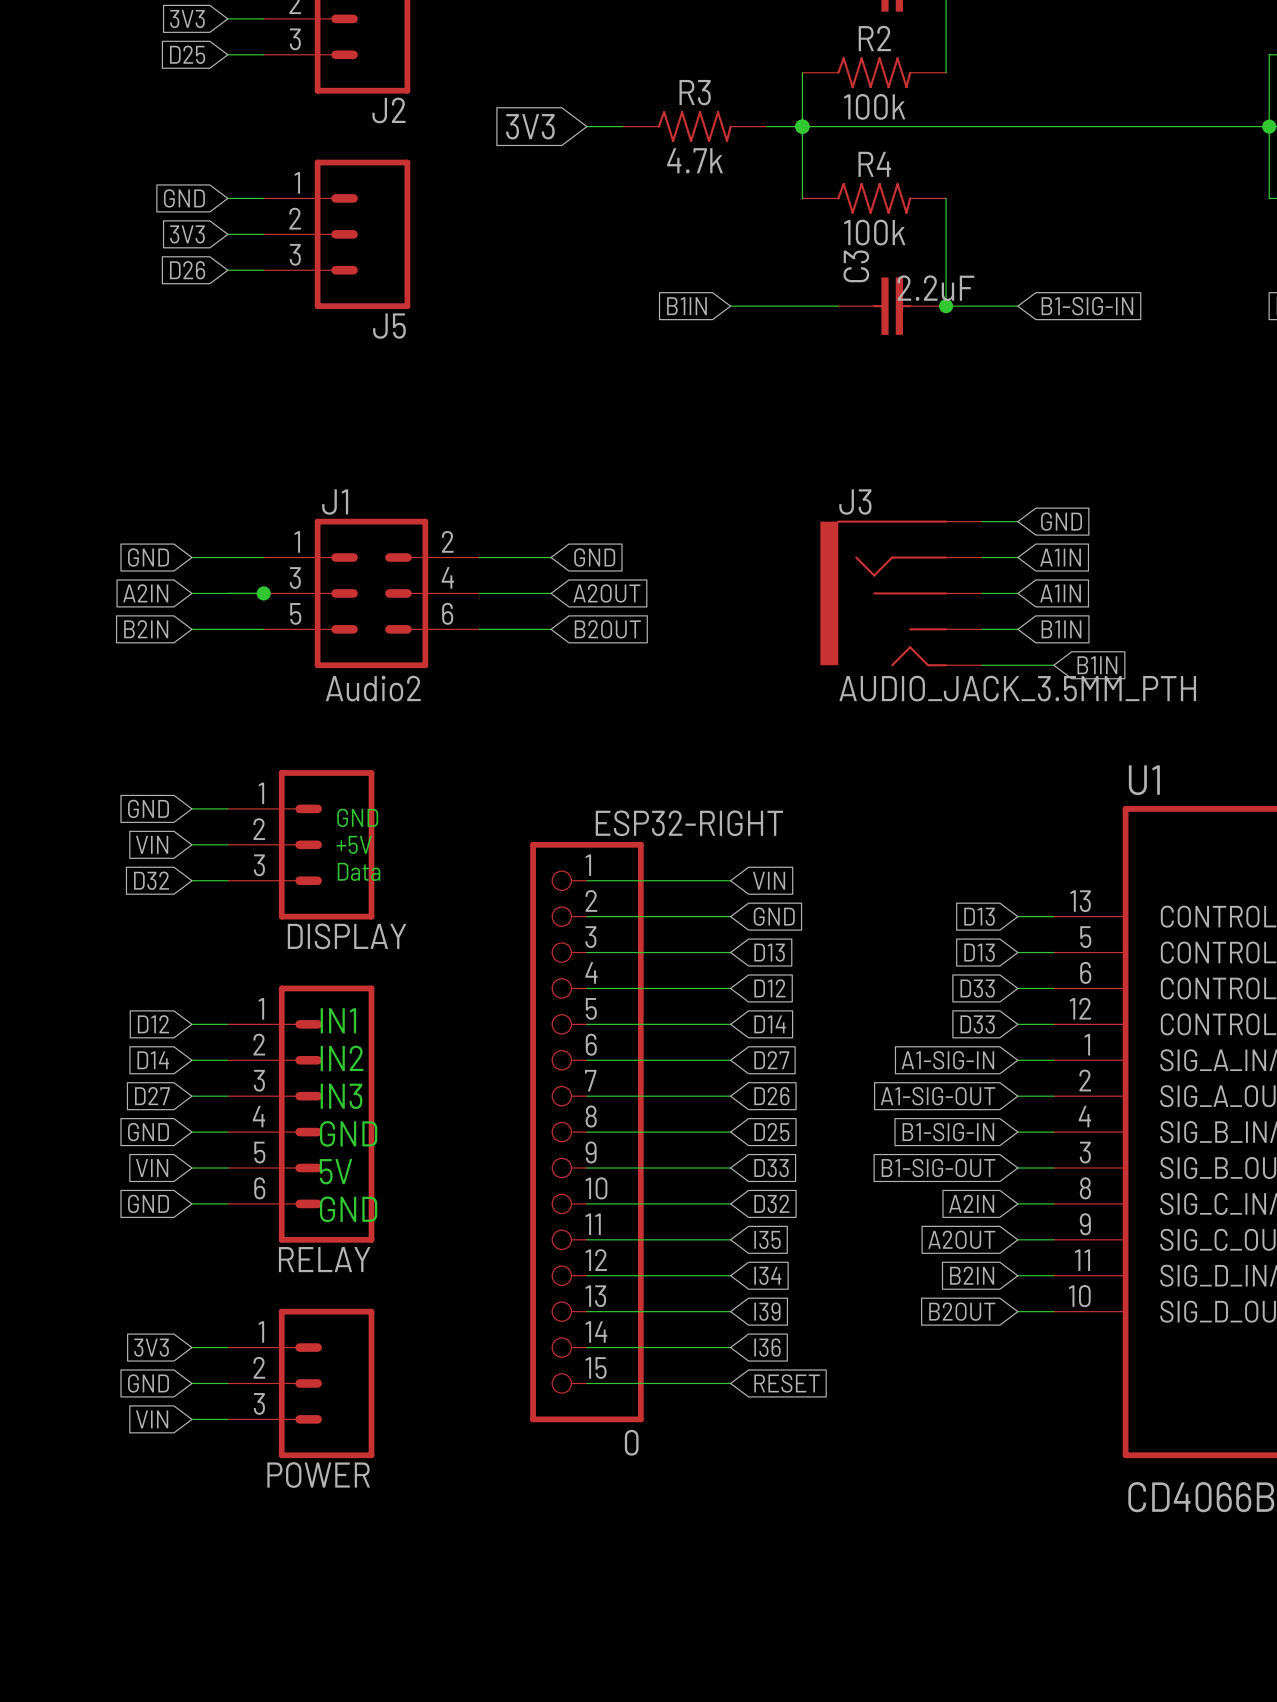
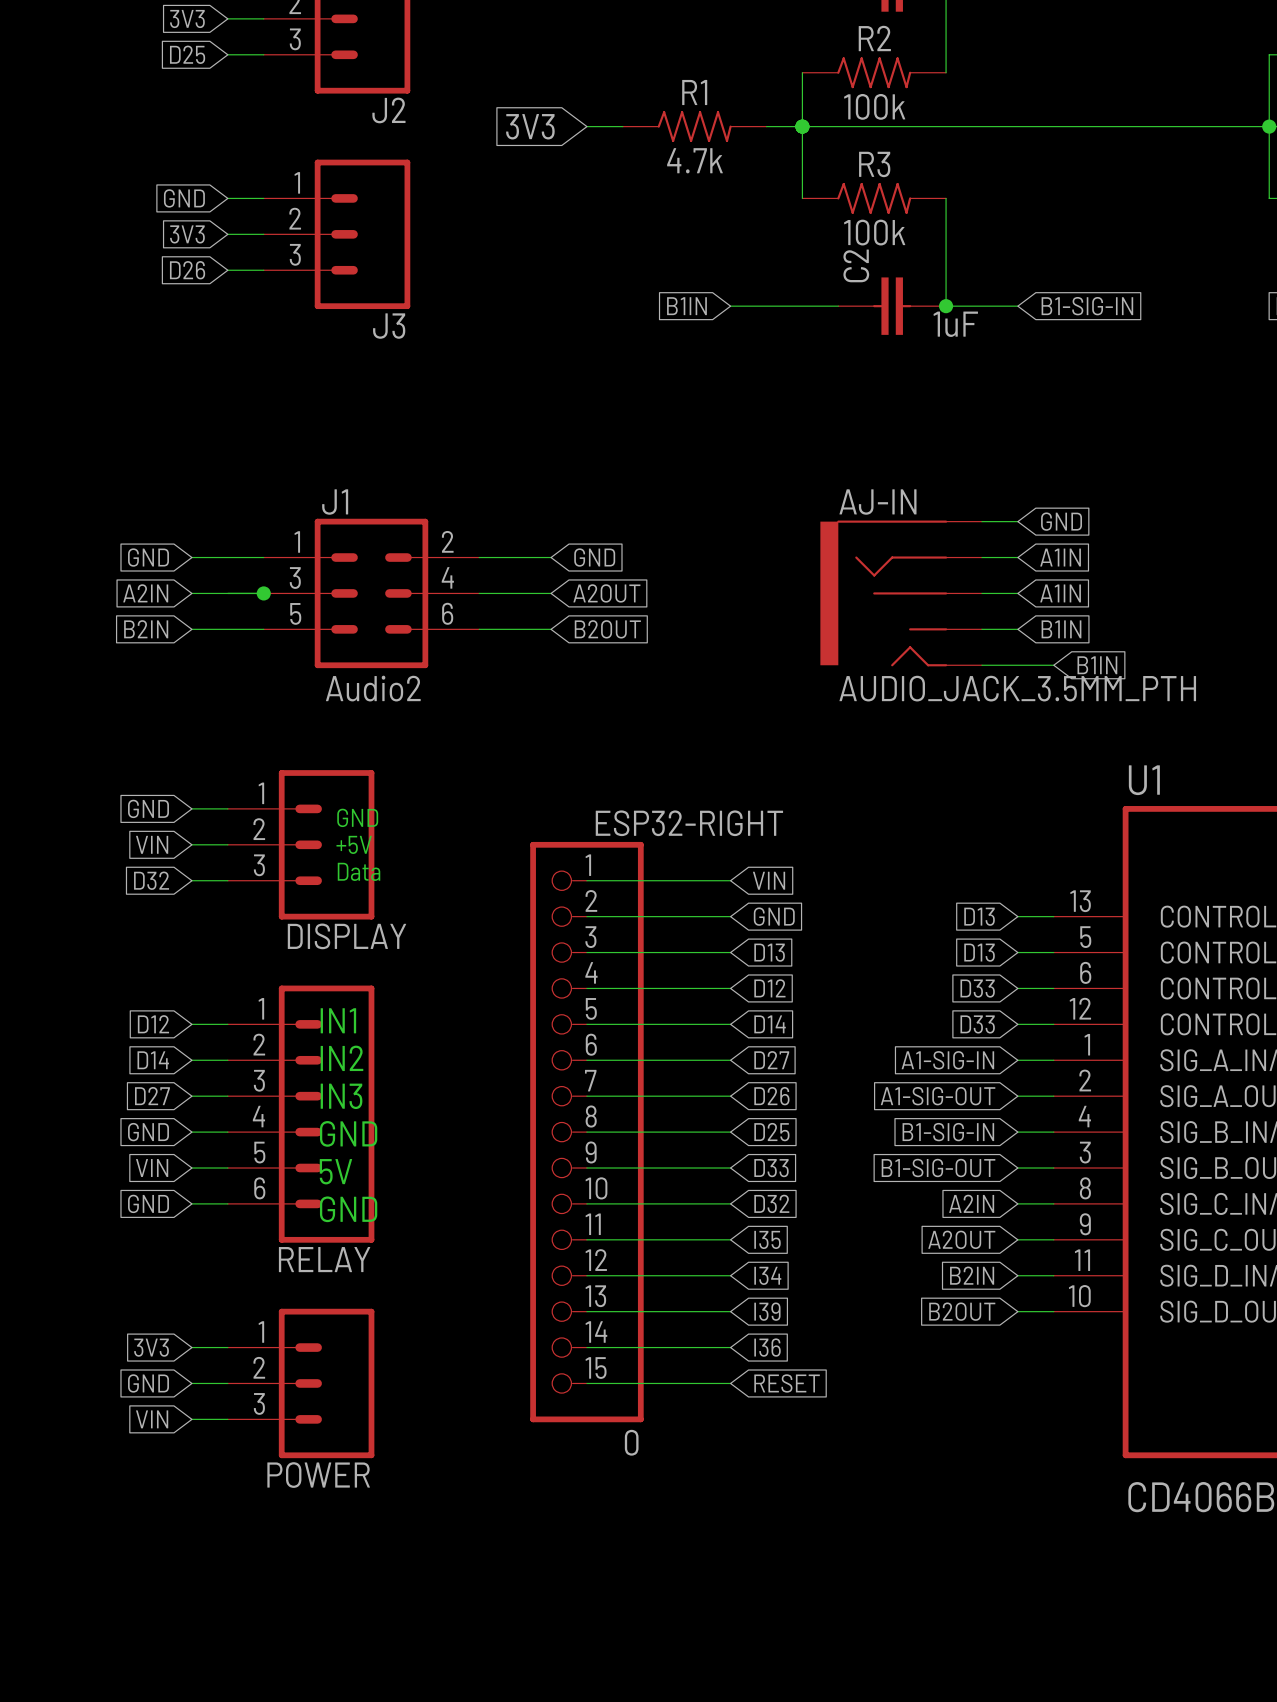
R3 name: R3 (695, 92) -> R1 (694, 92)
R4 name: R4 (874, 164) -> R3 (874, 164)
C3 name: C3 (856, 266) -> C2 (856, 265)
C3 value: 2.2uF (936, 288) -> 1uF (955, 324)
J5 name: J5 (389, 326) -> J3 (389, 326)
J3 name: J3 (855, 502) -> AJ-IN (877, 502)

